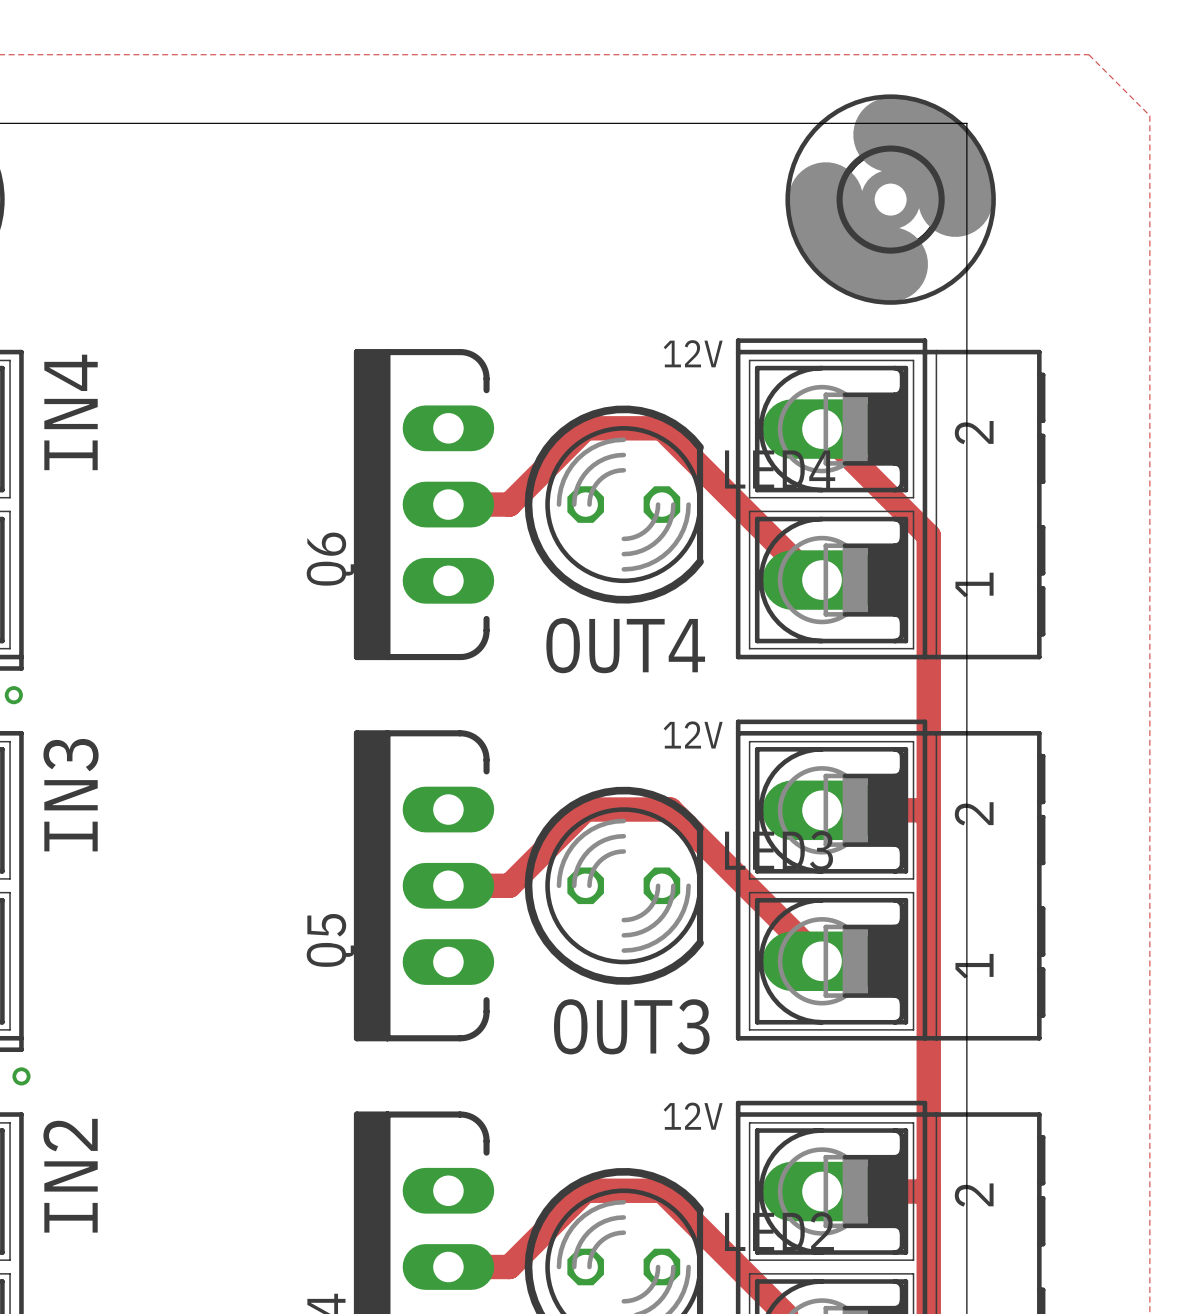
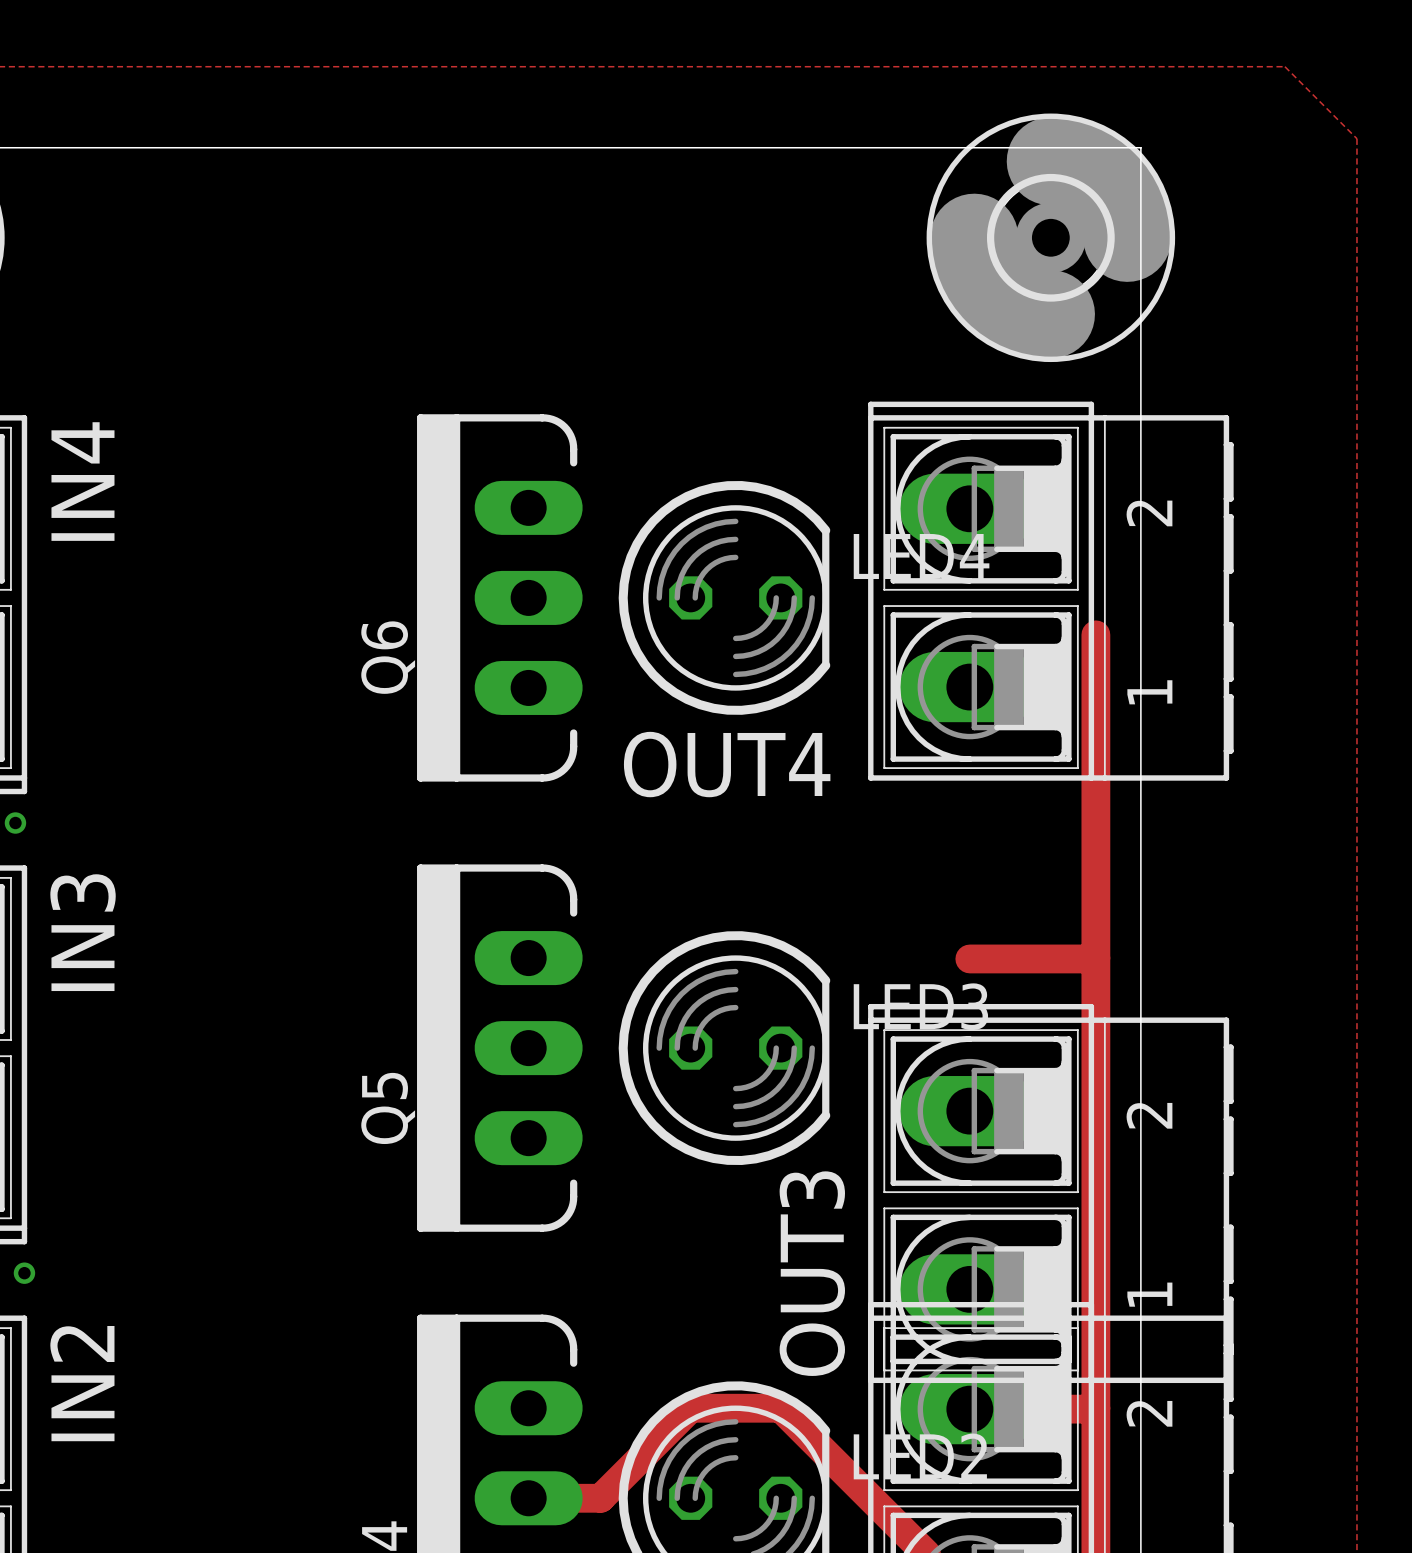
text: 12V (693, 353) -> none
track: (822, 429) (928, 535) -> none
track: (448, 504) (509, 504) (585, 428) (661, 428) (813, 580) (822, 580) -> none
text: 12V (693, 734) -> none
OUT3 position: (890, 880) -> (1050, 1193)
track: (448, 885) (509, 885) (585, 809) (670, 809) (822, 961) -> none
OUT3 name rotation: 0° (631, 1026) -> 90° counterclockwise (812, 1273)
text: 12V (693, 1116) -> none

